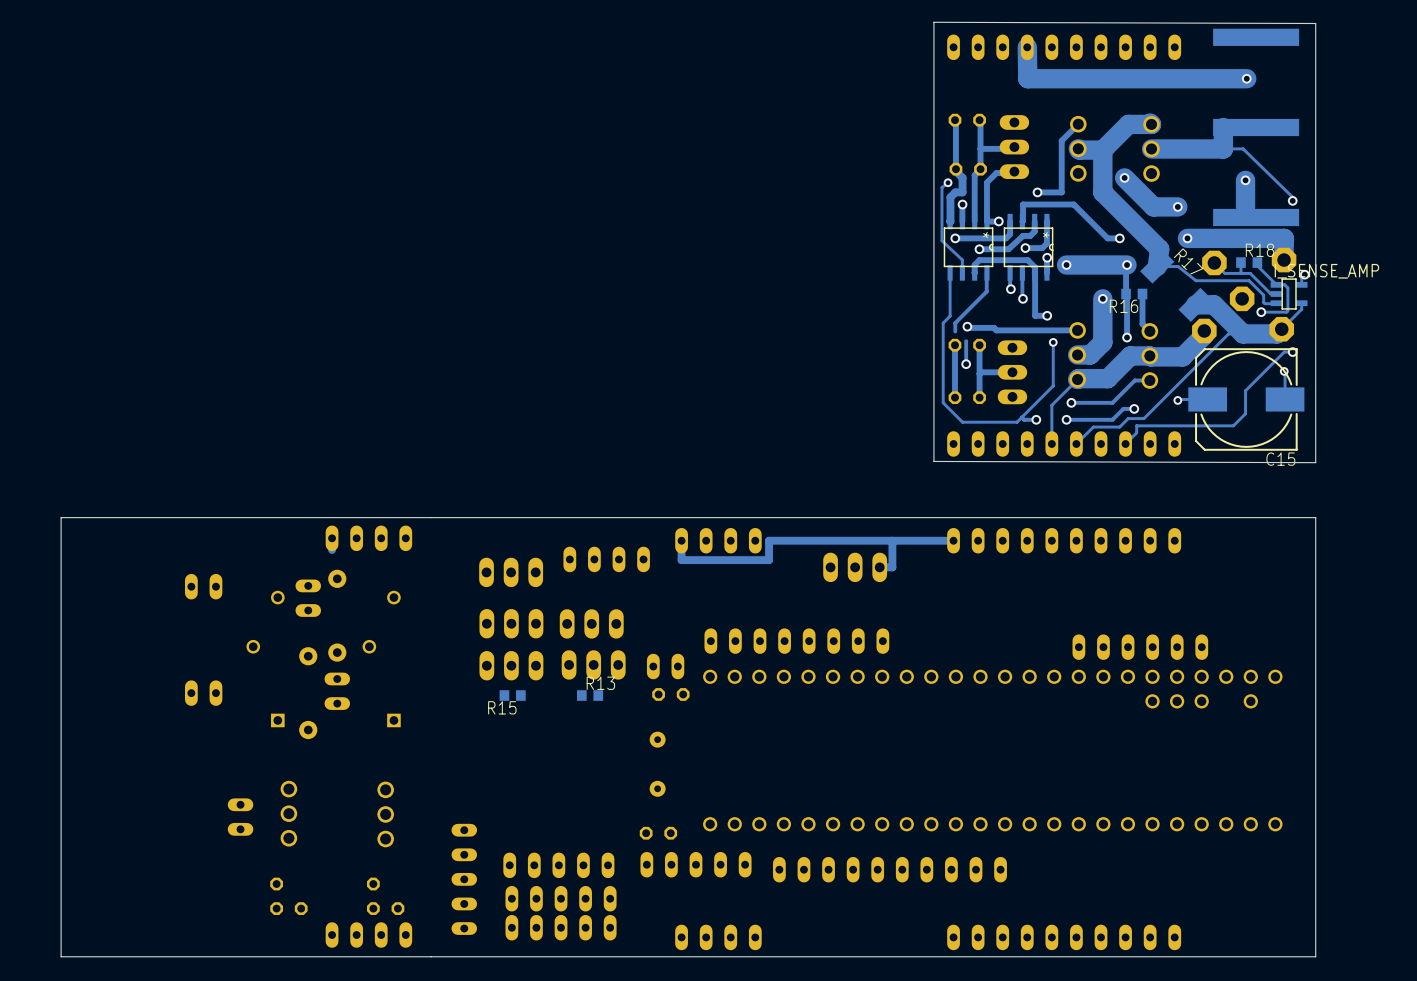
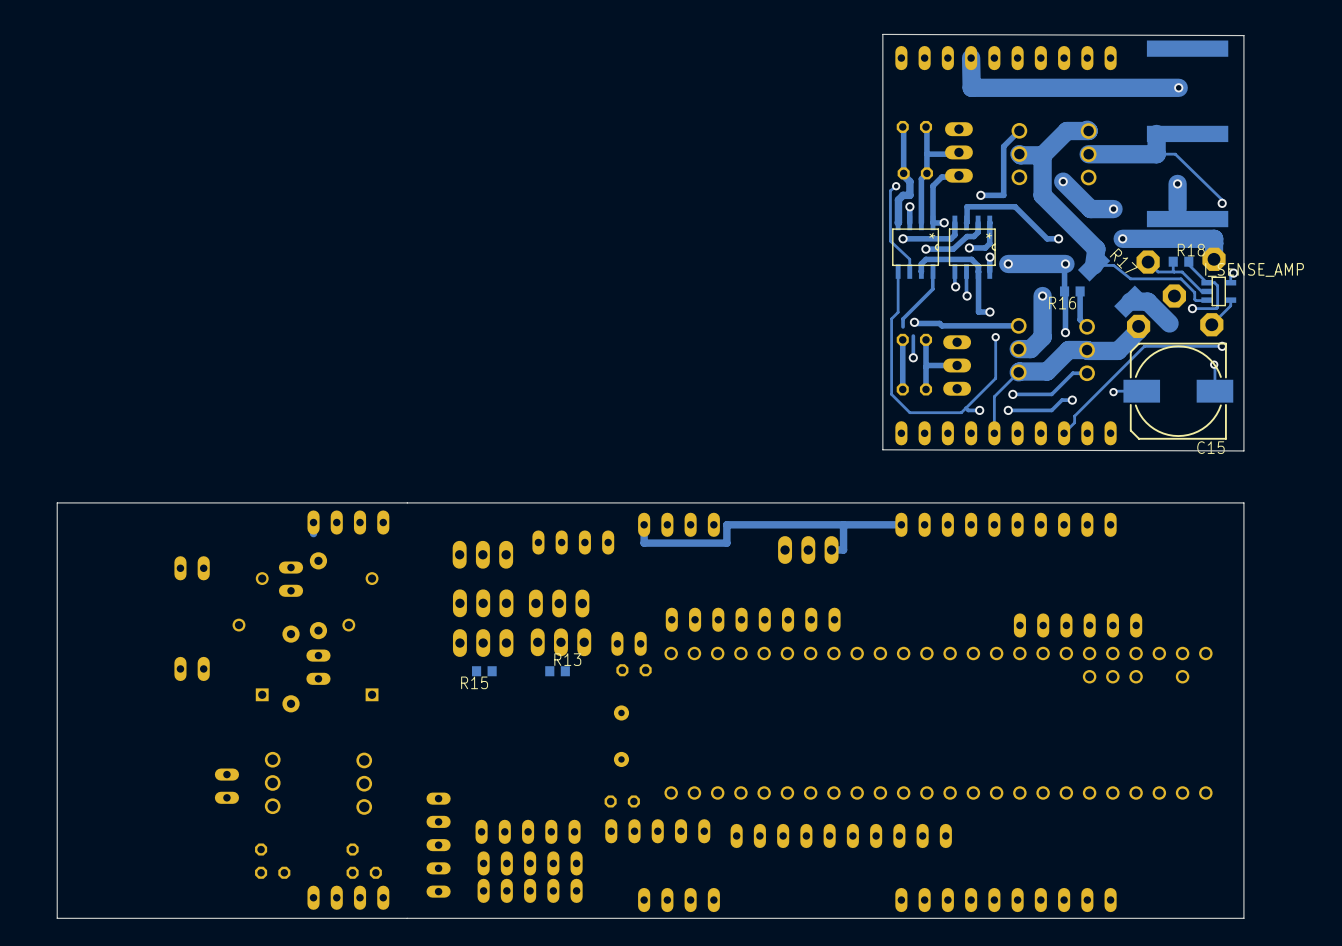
track: (1281, 329) (1277, 333) (1243, 333) -> none
track: (1243, 333) (1228, 333) (1210, 352) -> (1214, 346) (1144, 346)
track: (1284, 352) (1245, 390) (1245, 413) (1233, 425) (1136, 425) -> none
track: (1143, 418) (1128, 418) (1119, 427) (1093, 427) (1076, 443) -> (1081, 409) (1074, 416)

